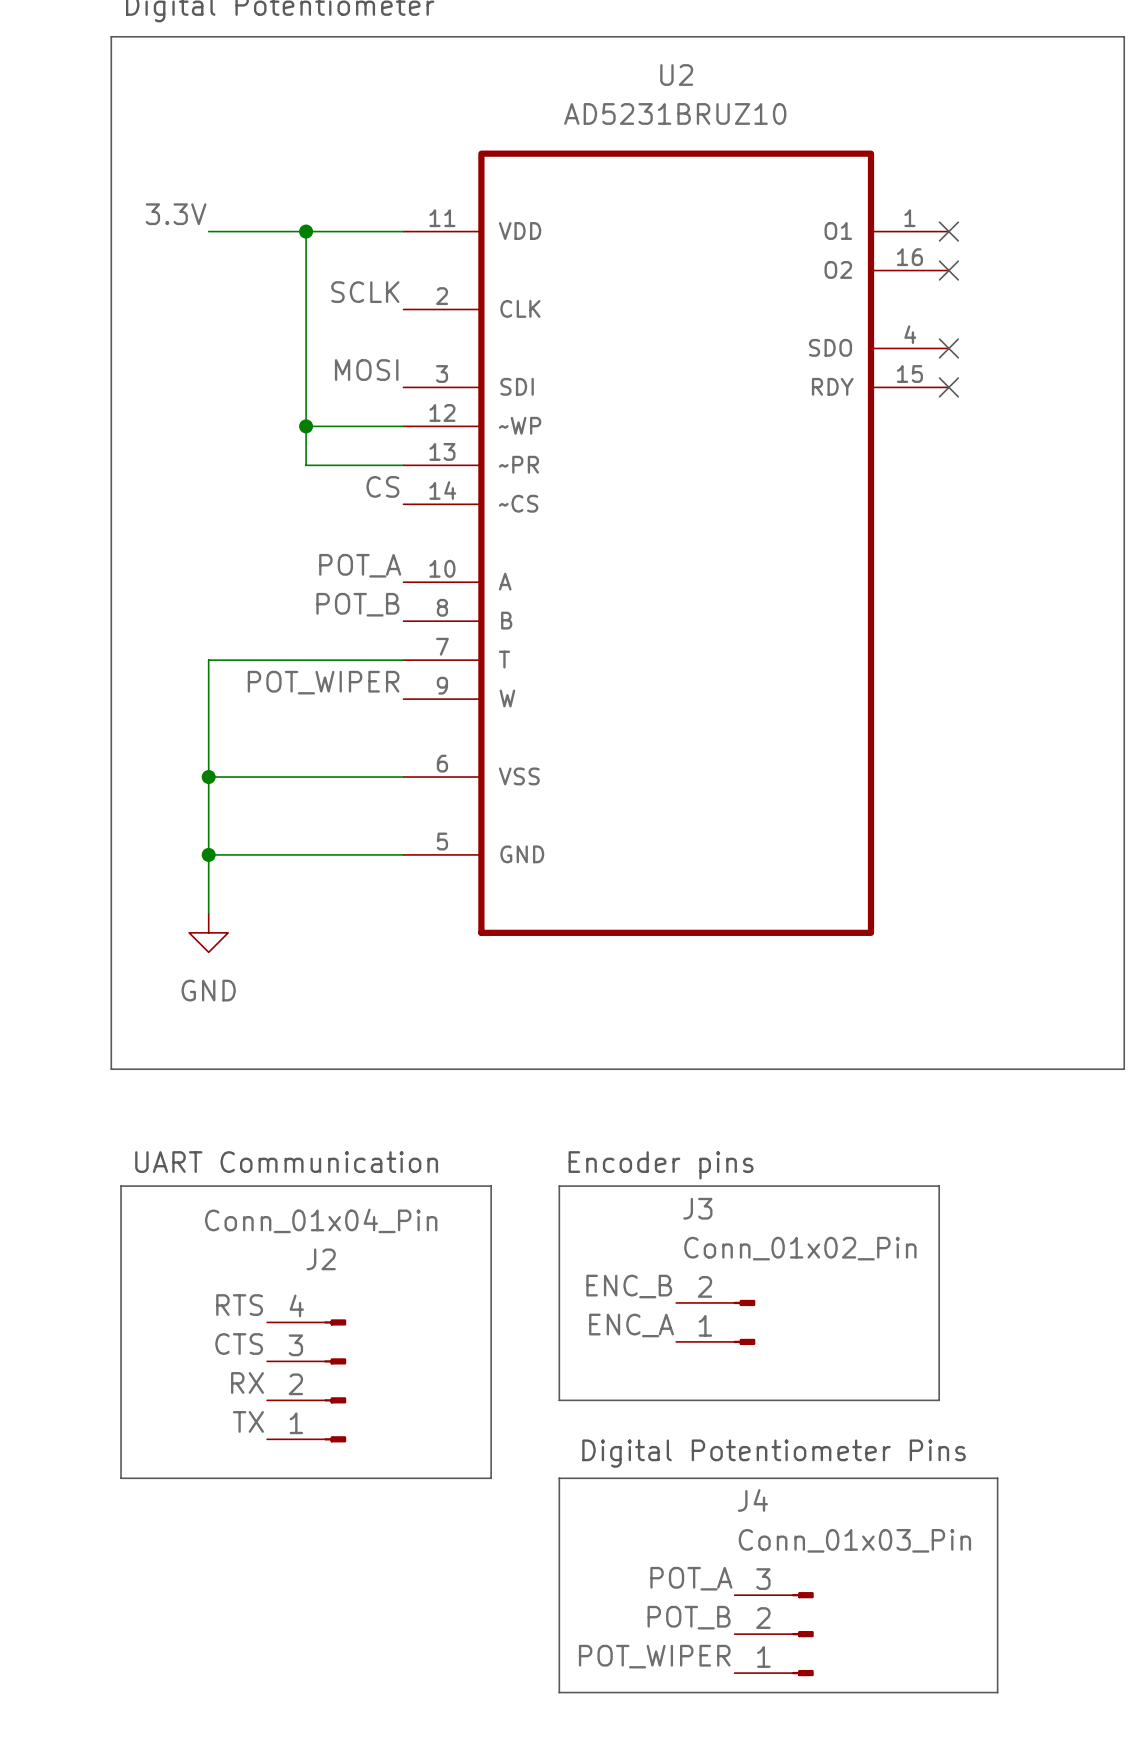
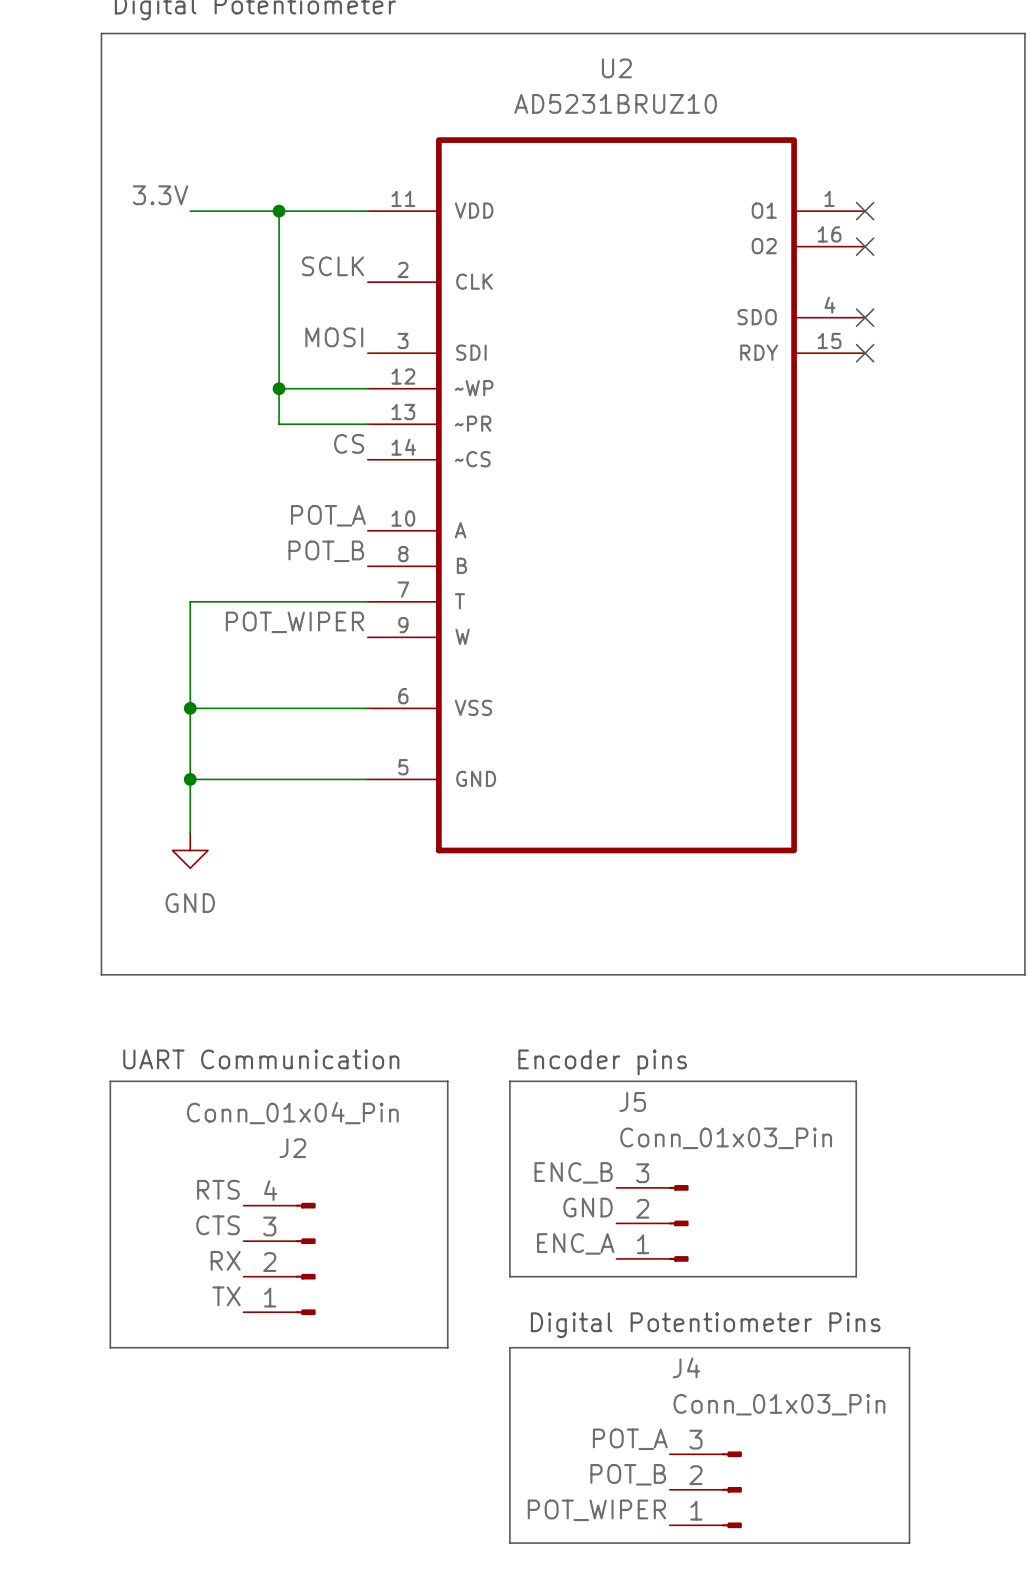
J3: Conn_01x02_Pin (715, 1322) -> none
label: ENC_A (631, 1325) -> GND (588, 1207)
J5: none -> Conn_01x03_Pin (652, 1223)
label: none -> ENC_A (575, 1243)

